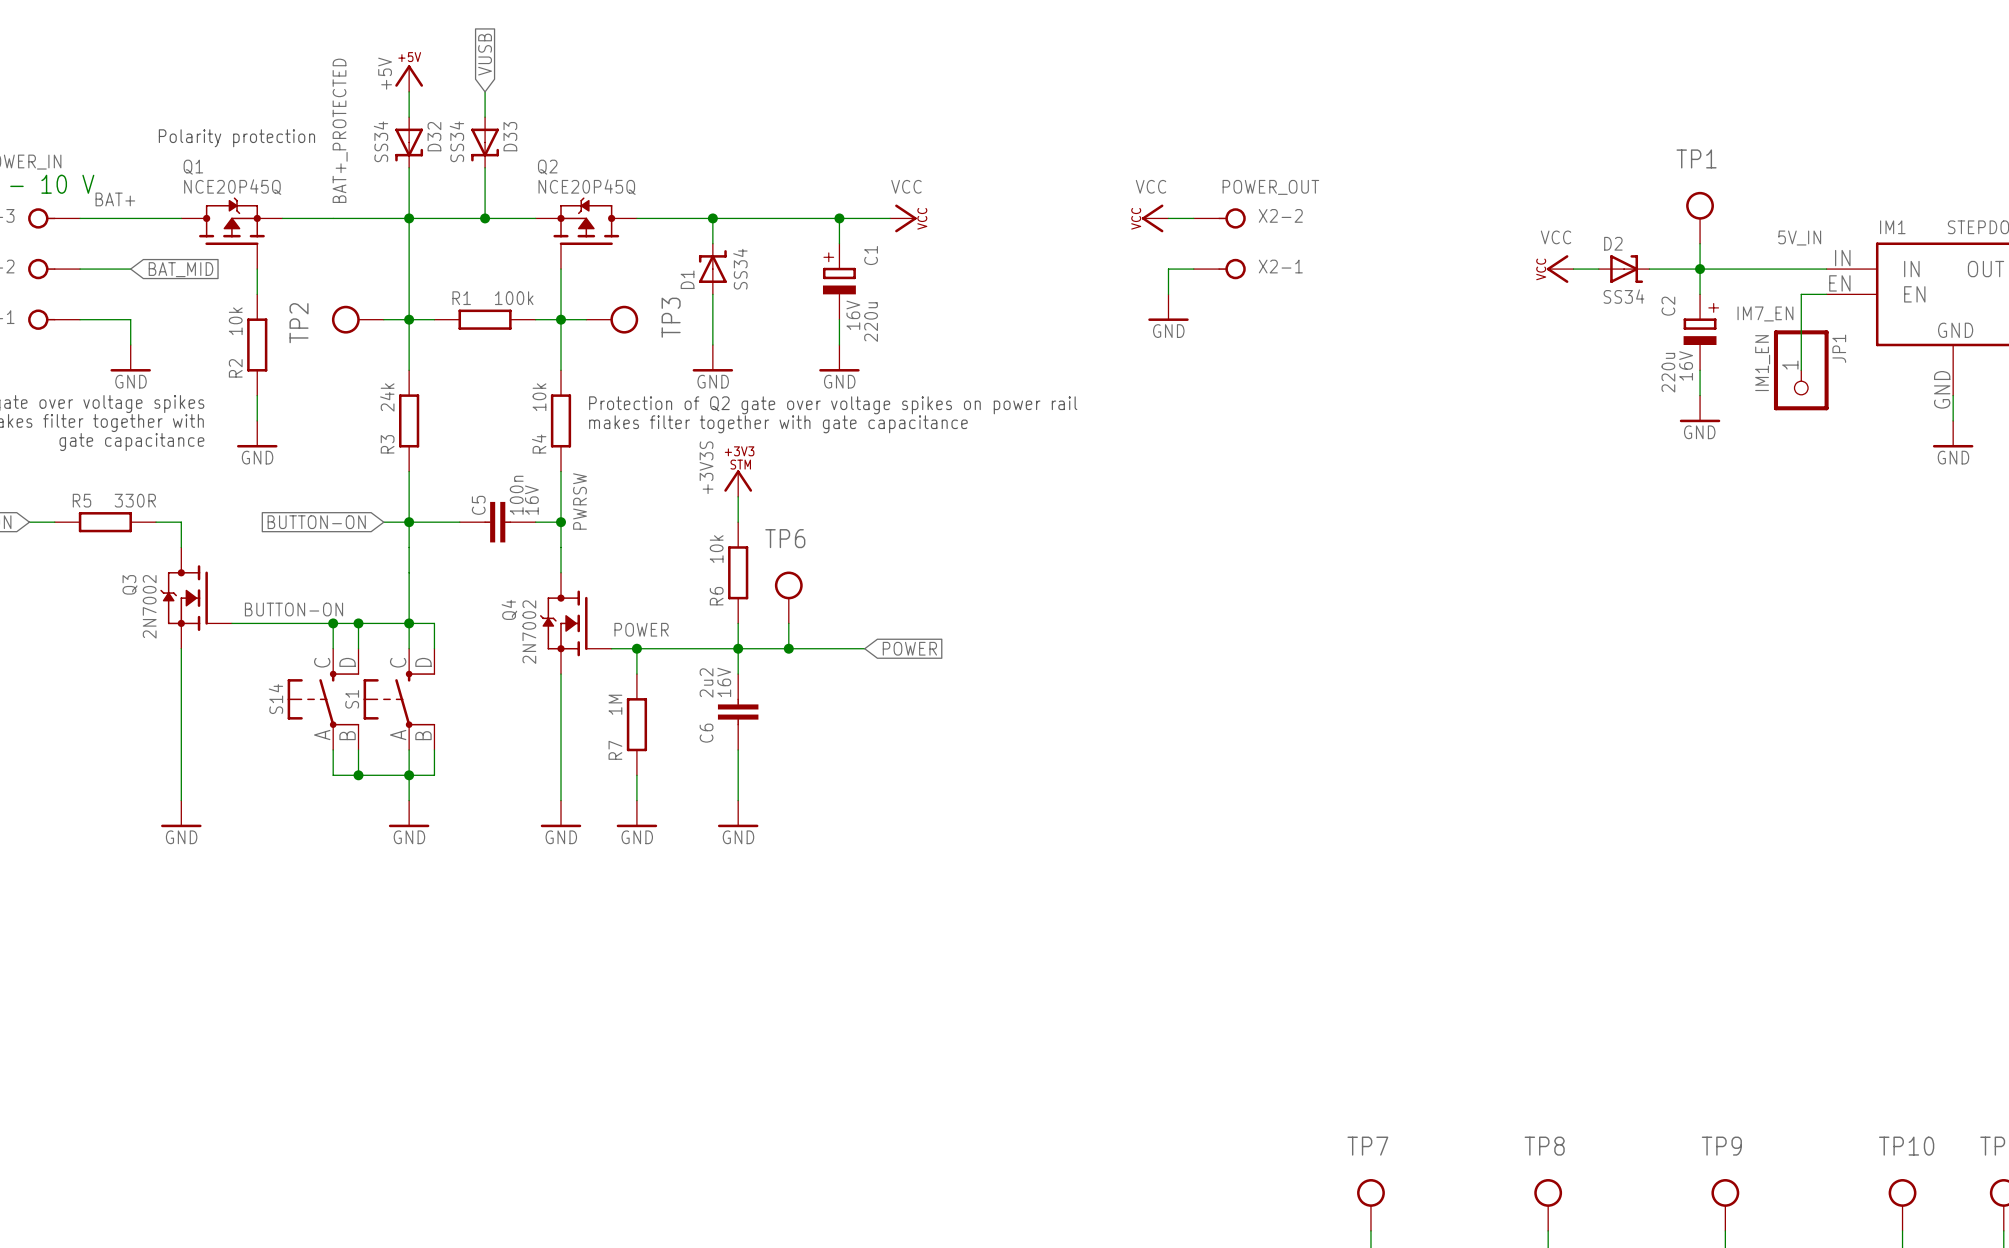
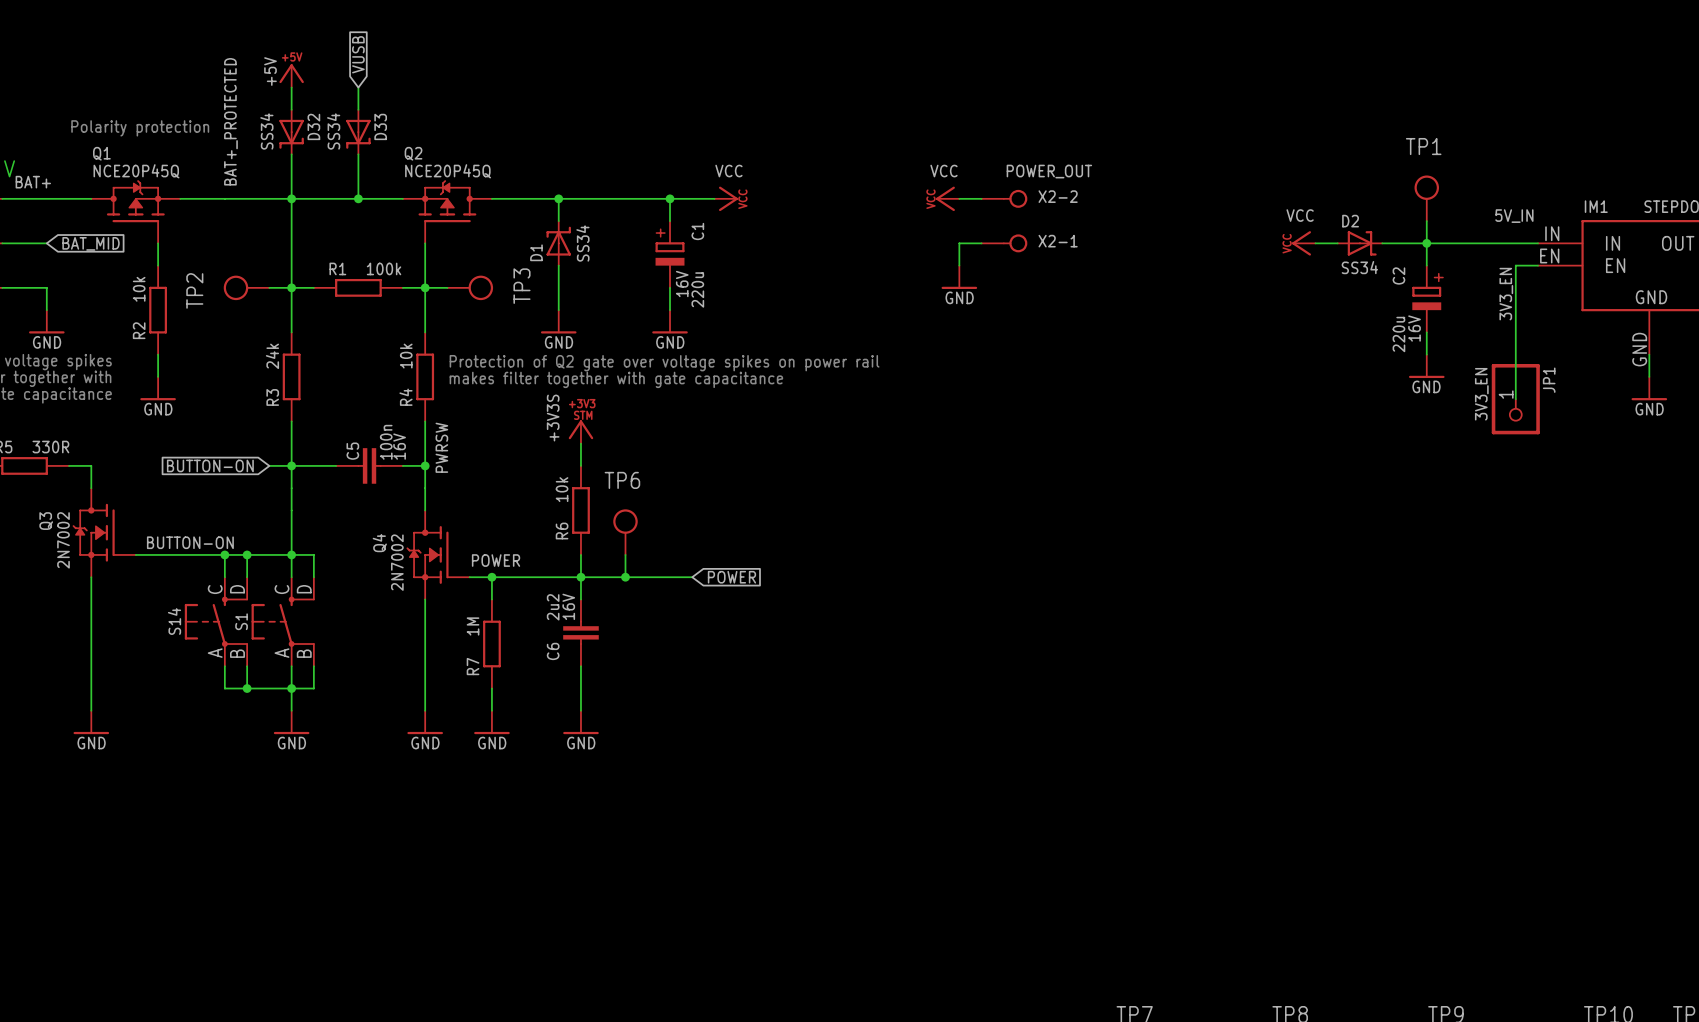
label: IM7_EN (1765, 313) -> none
label: none -> 3V3_EN (1506, 294)
JP1 value: IM1_EN (1762, 363) -> 3V3_EN (1481, 394)
wire: none -> (1515, 332) (1515, 399)
JP1 position: (1801, 370) -> (1515, 399)

